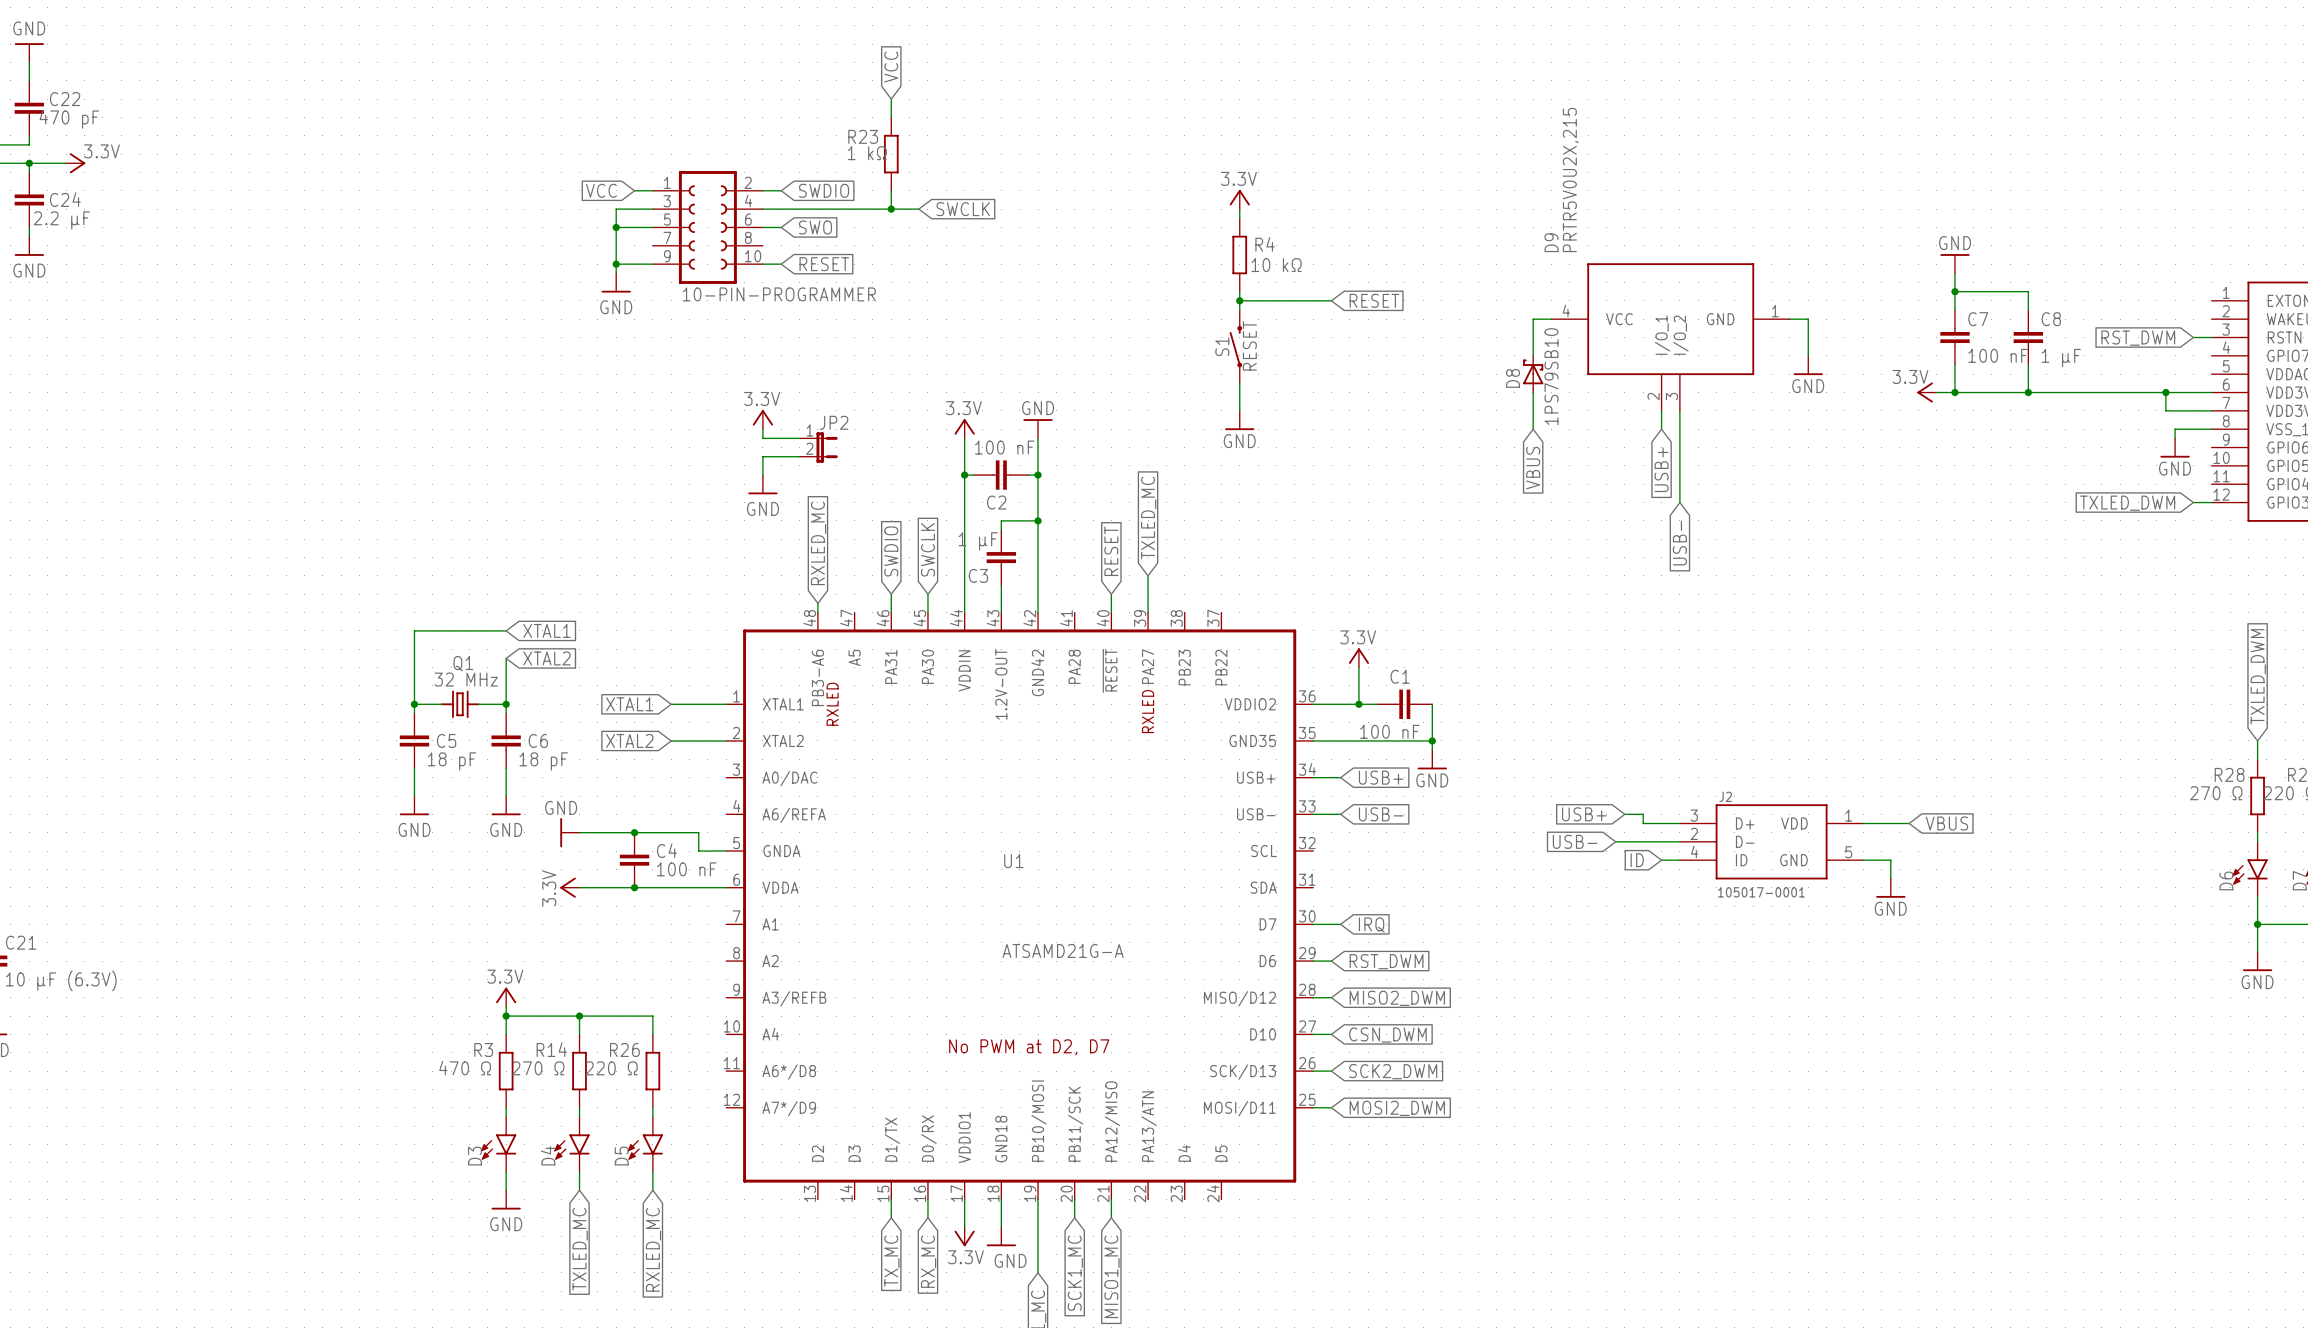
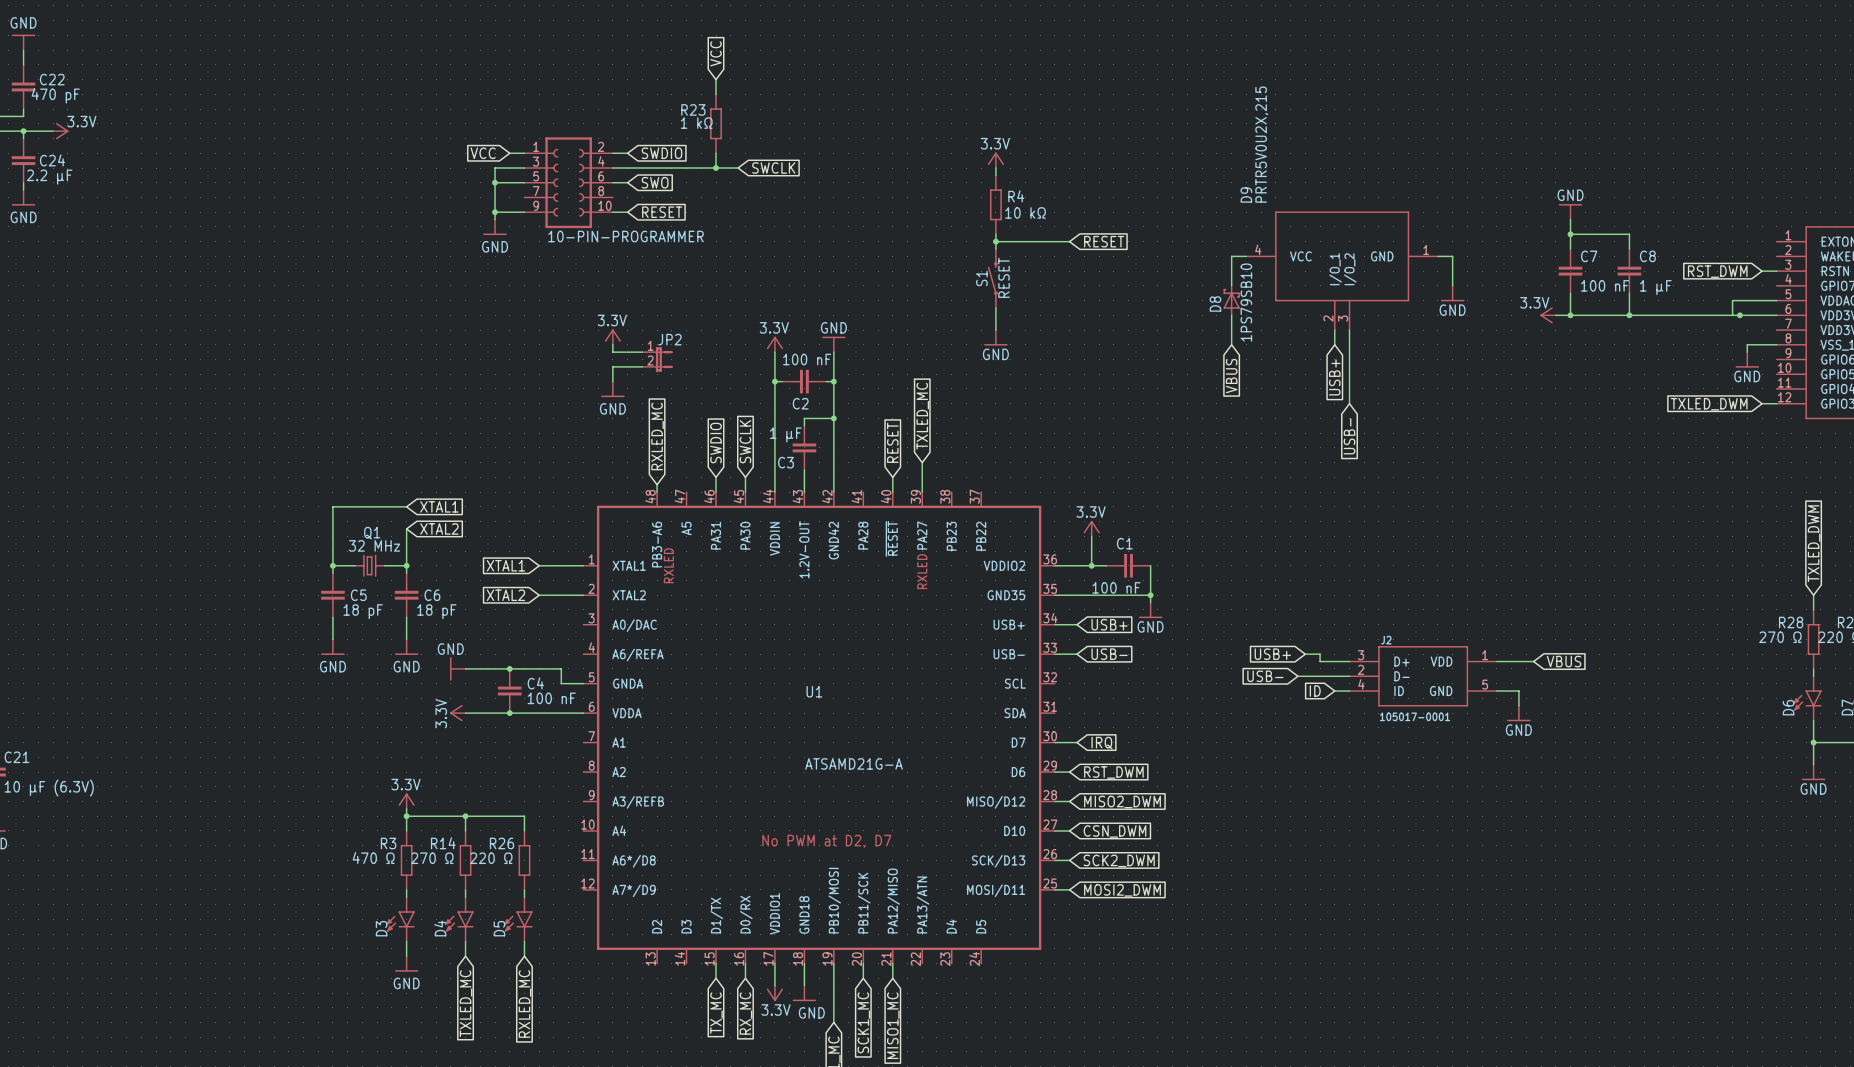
wire: none -> (1776, 300) (1732, 300) (1732, 315)
wire: (2165, 392) (2165, 410) (2211, 410) -> none

